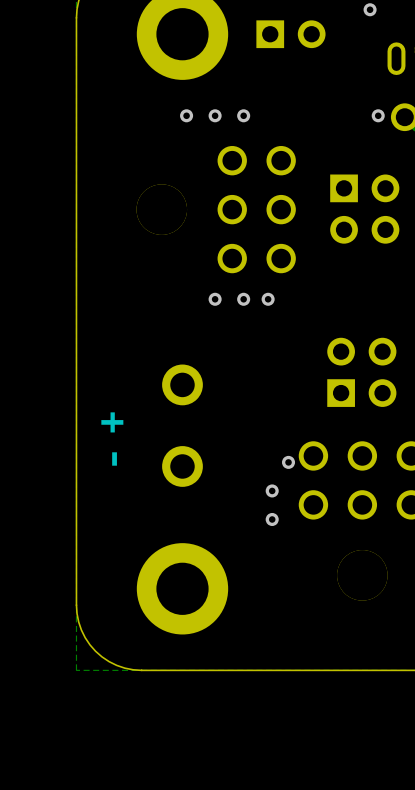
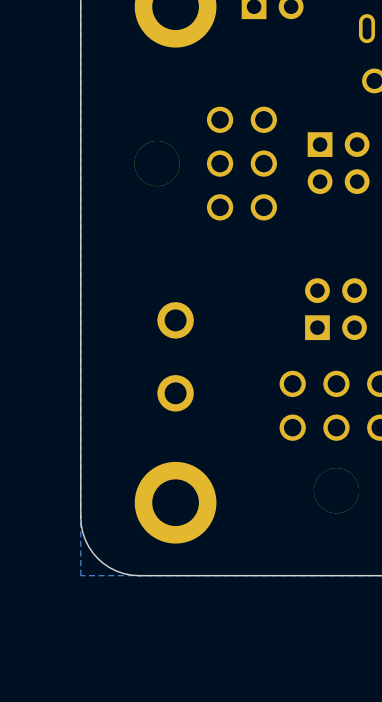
via: (186, 115) -> none
via: (215, 115) -> none
via: (243, 115) -> none
via: (378, 115) -> none
via: (215, 299) -> none
via: (243, 299) -> none
via: (268, 299) -> none
text: - + (112, 439) -> none
via: (288, 462) -> none
via: (272, 490) -> none
via: (272, 519) -> none

